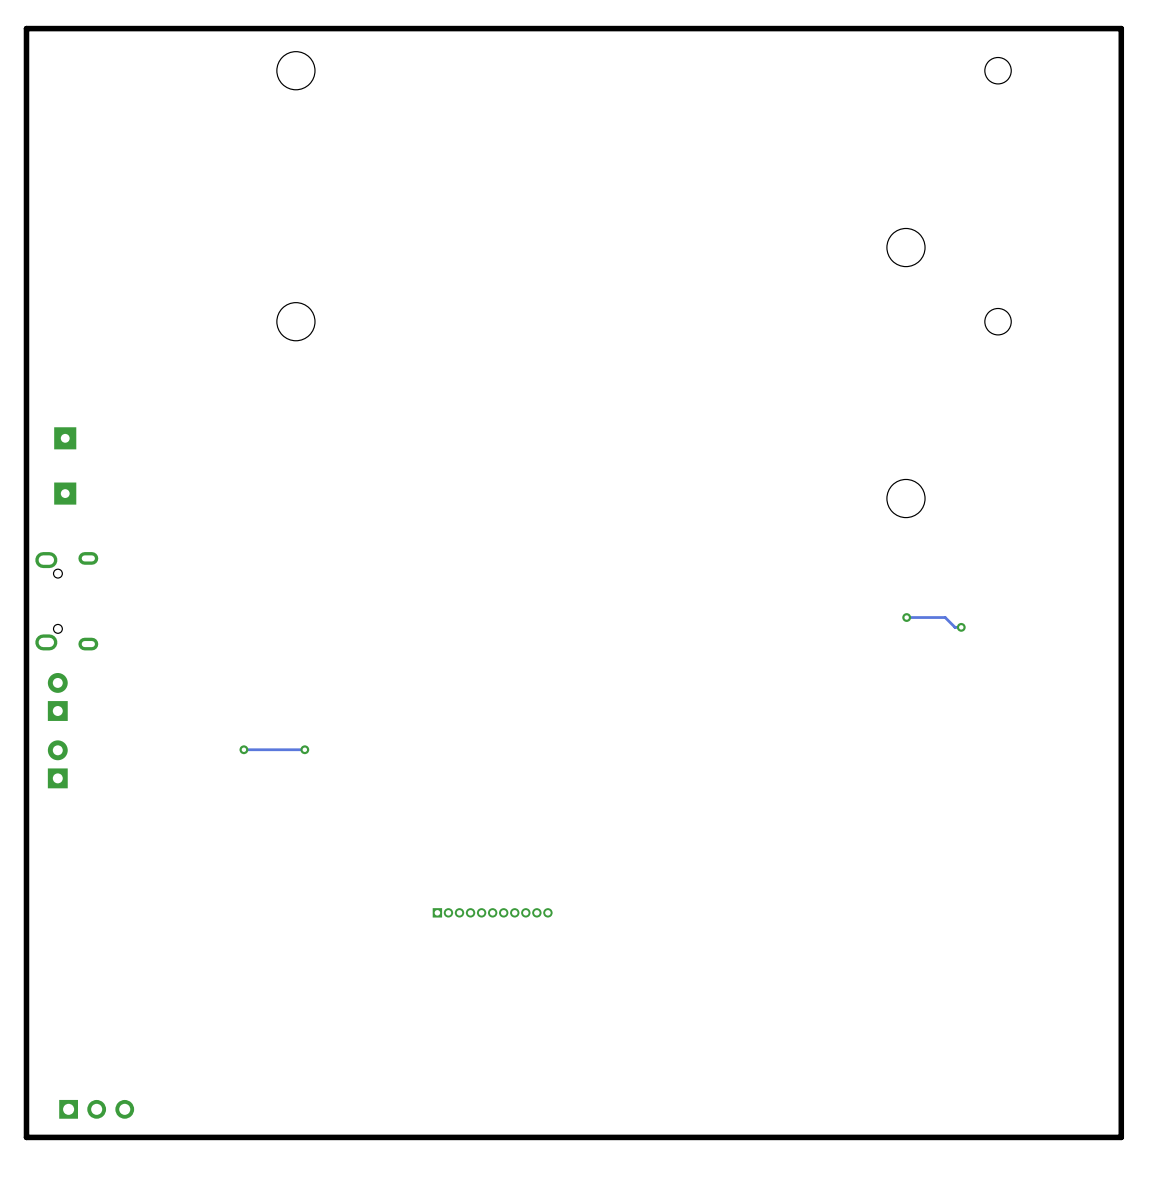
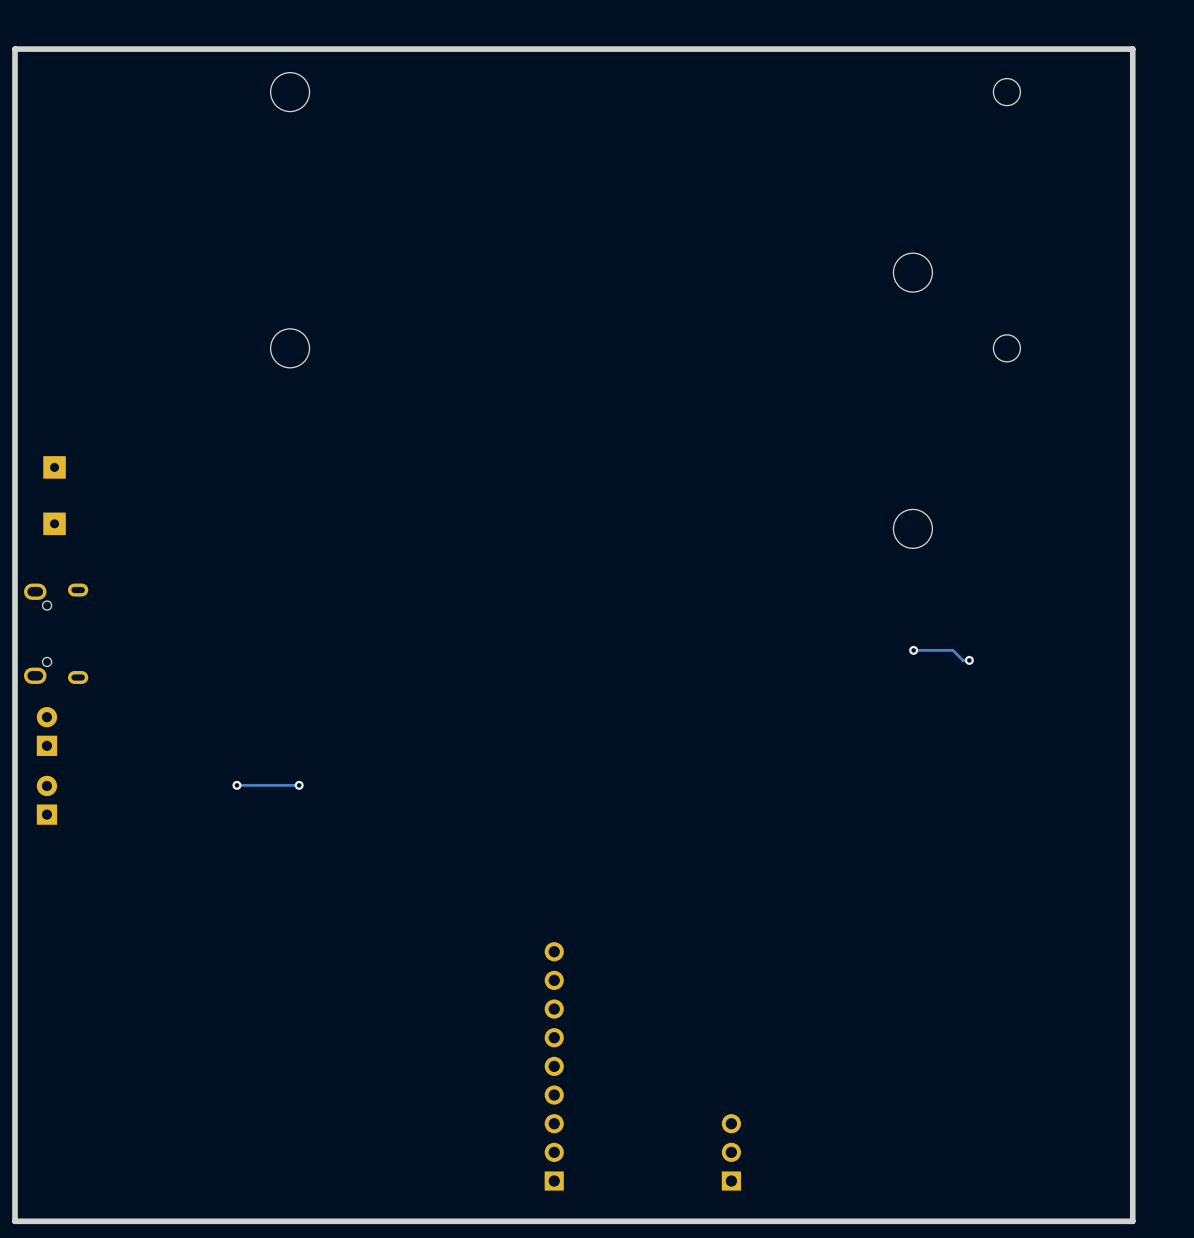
part: (492, 912) -> none
part: none -> (554, 1066)
part: (96, 1109) -> none
part: none -> (731, 1152)
board edge: (1121, 1137) (26, 1137) -> (1132, 1181) (1132, 1221) (14, 1221) (14, 1181)

